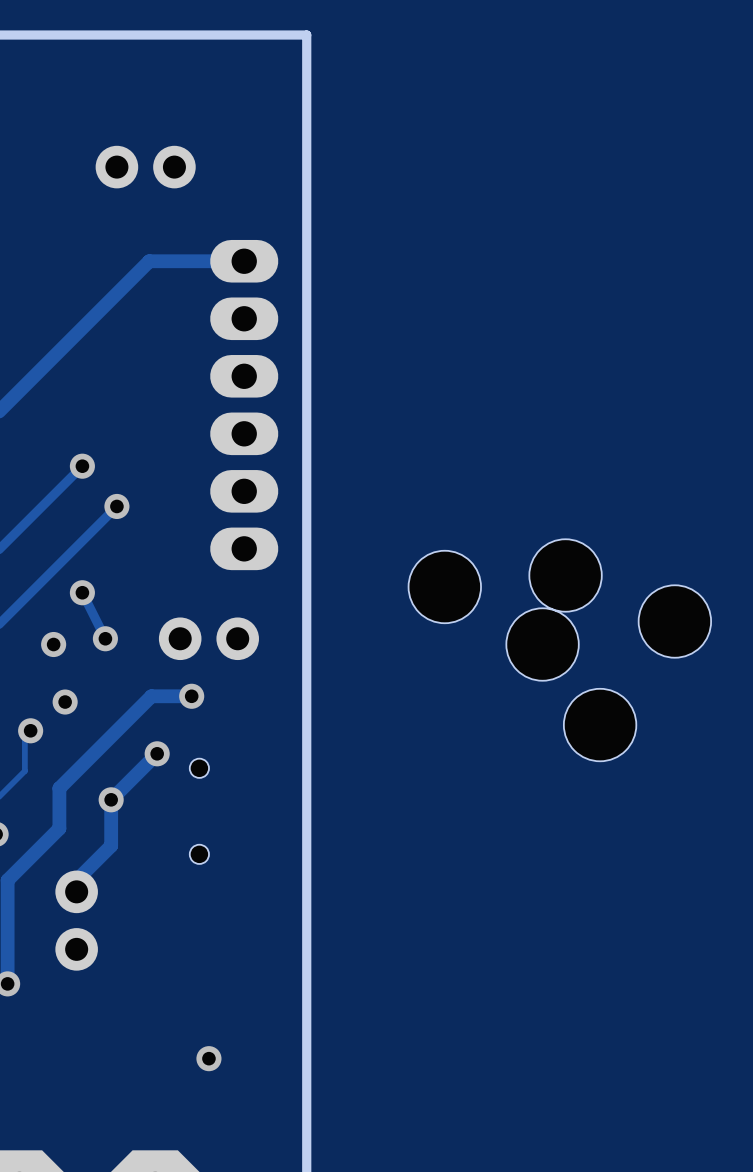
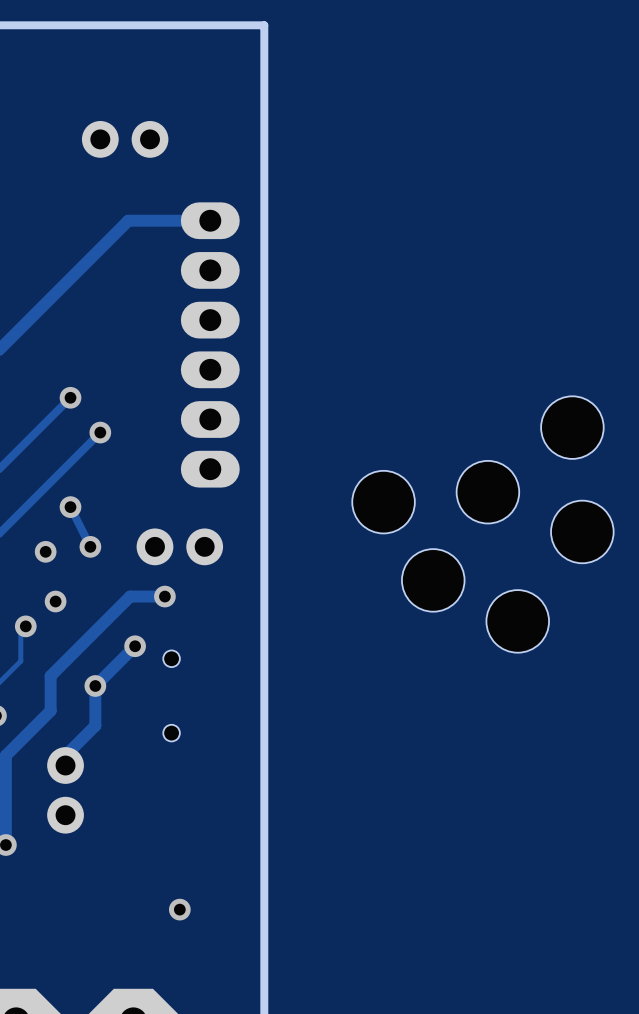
hole: none -> (572, 427)
hole position: (542, 644) -> (433, 580)

